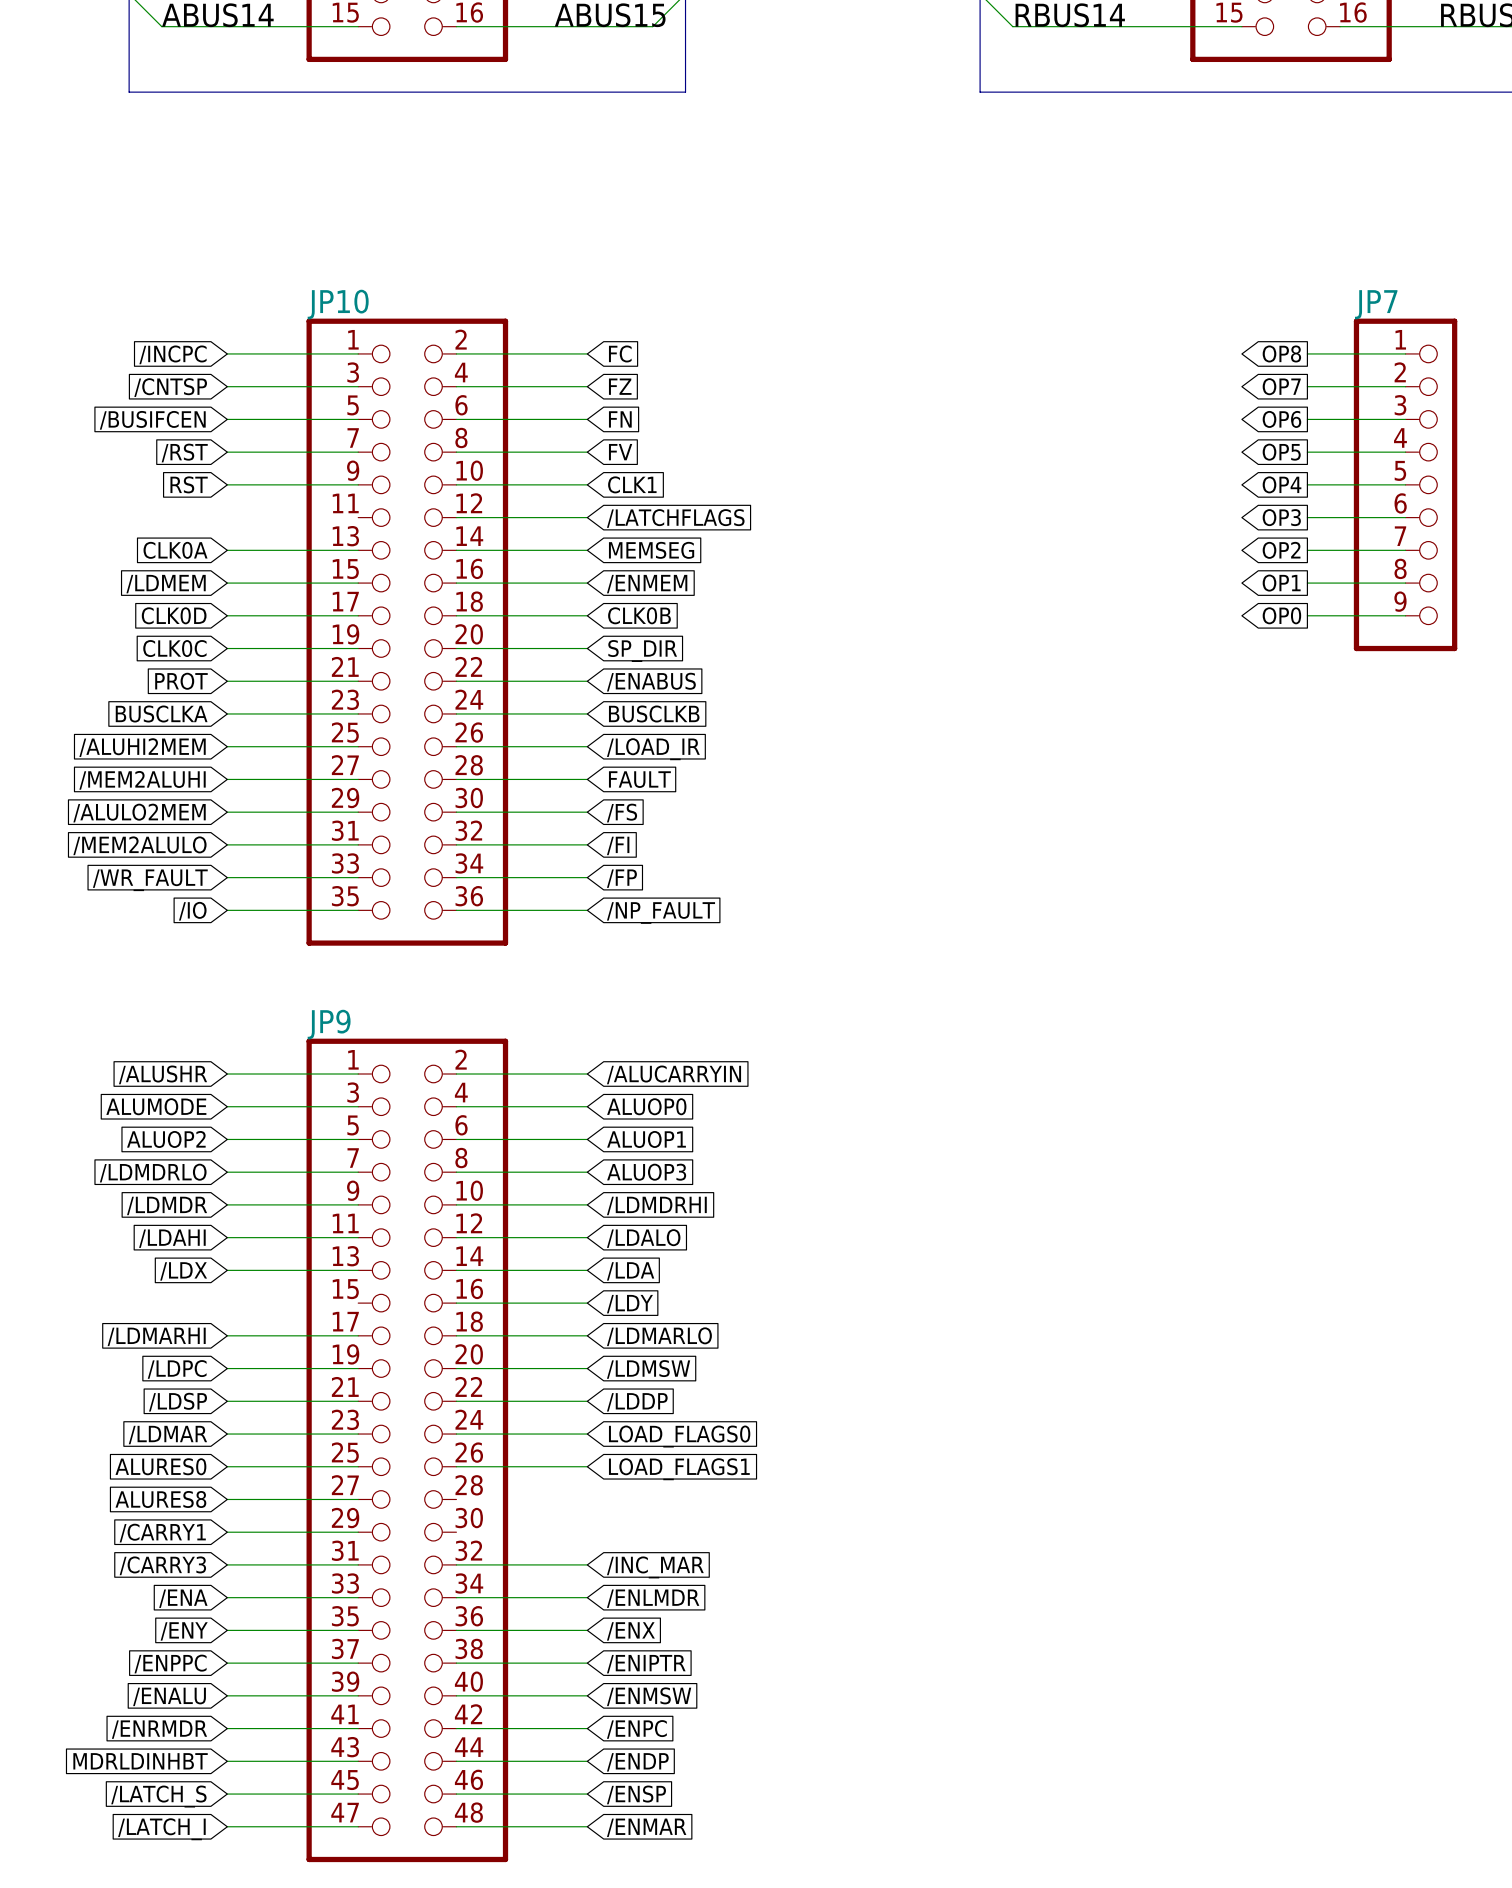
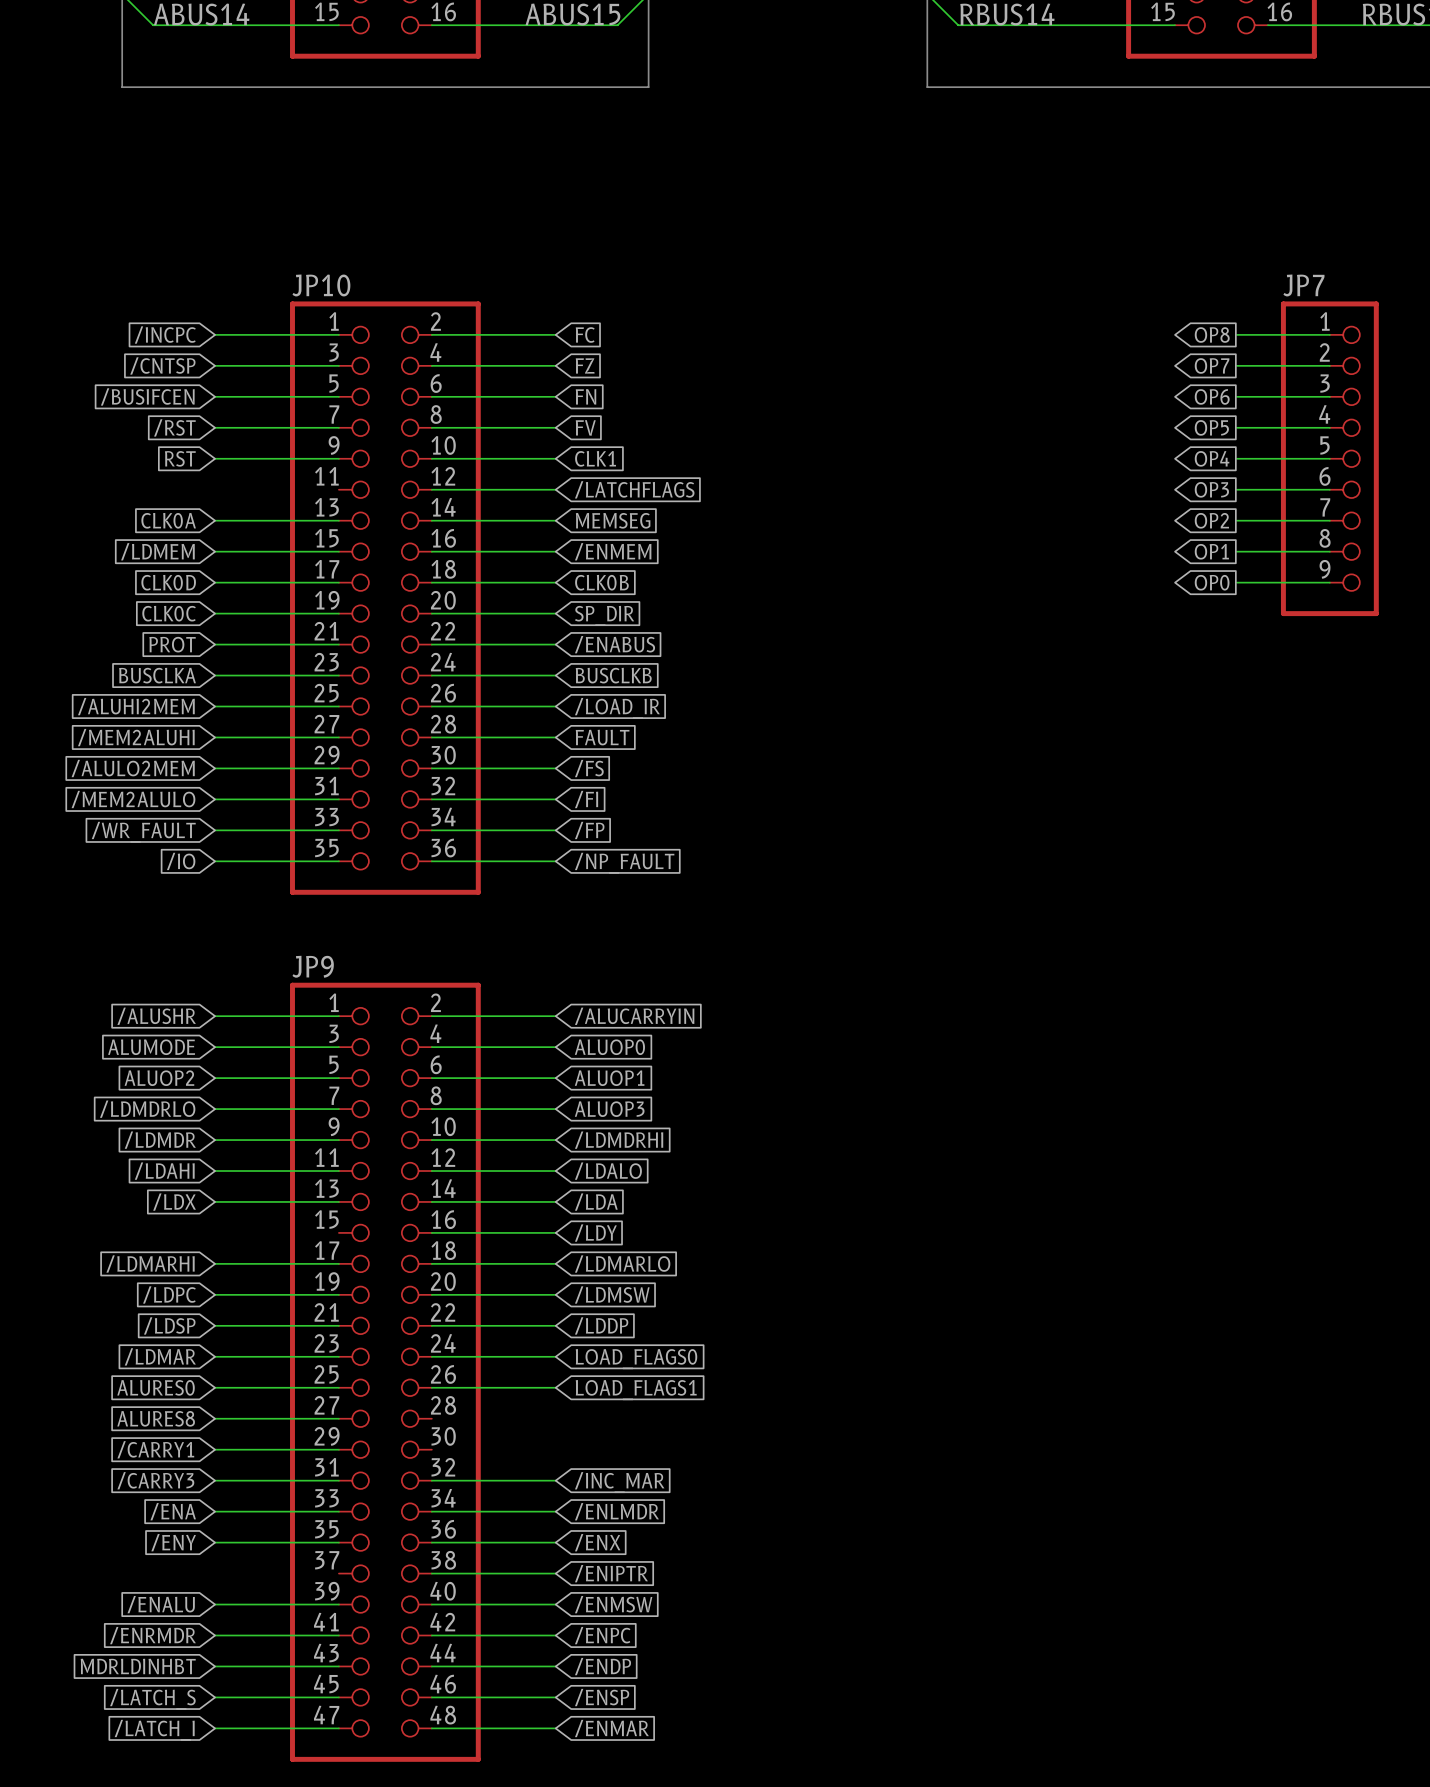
wire: (227, 1663) (358, 1663) -> none
global label: /ENPPC (170, 1664) -> none

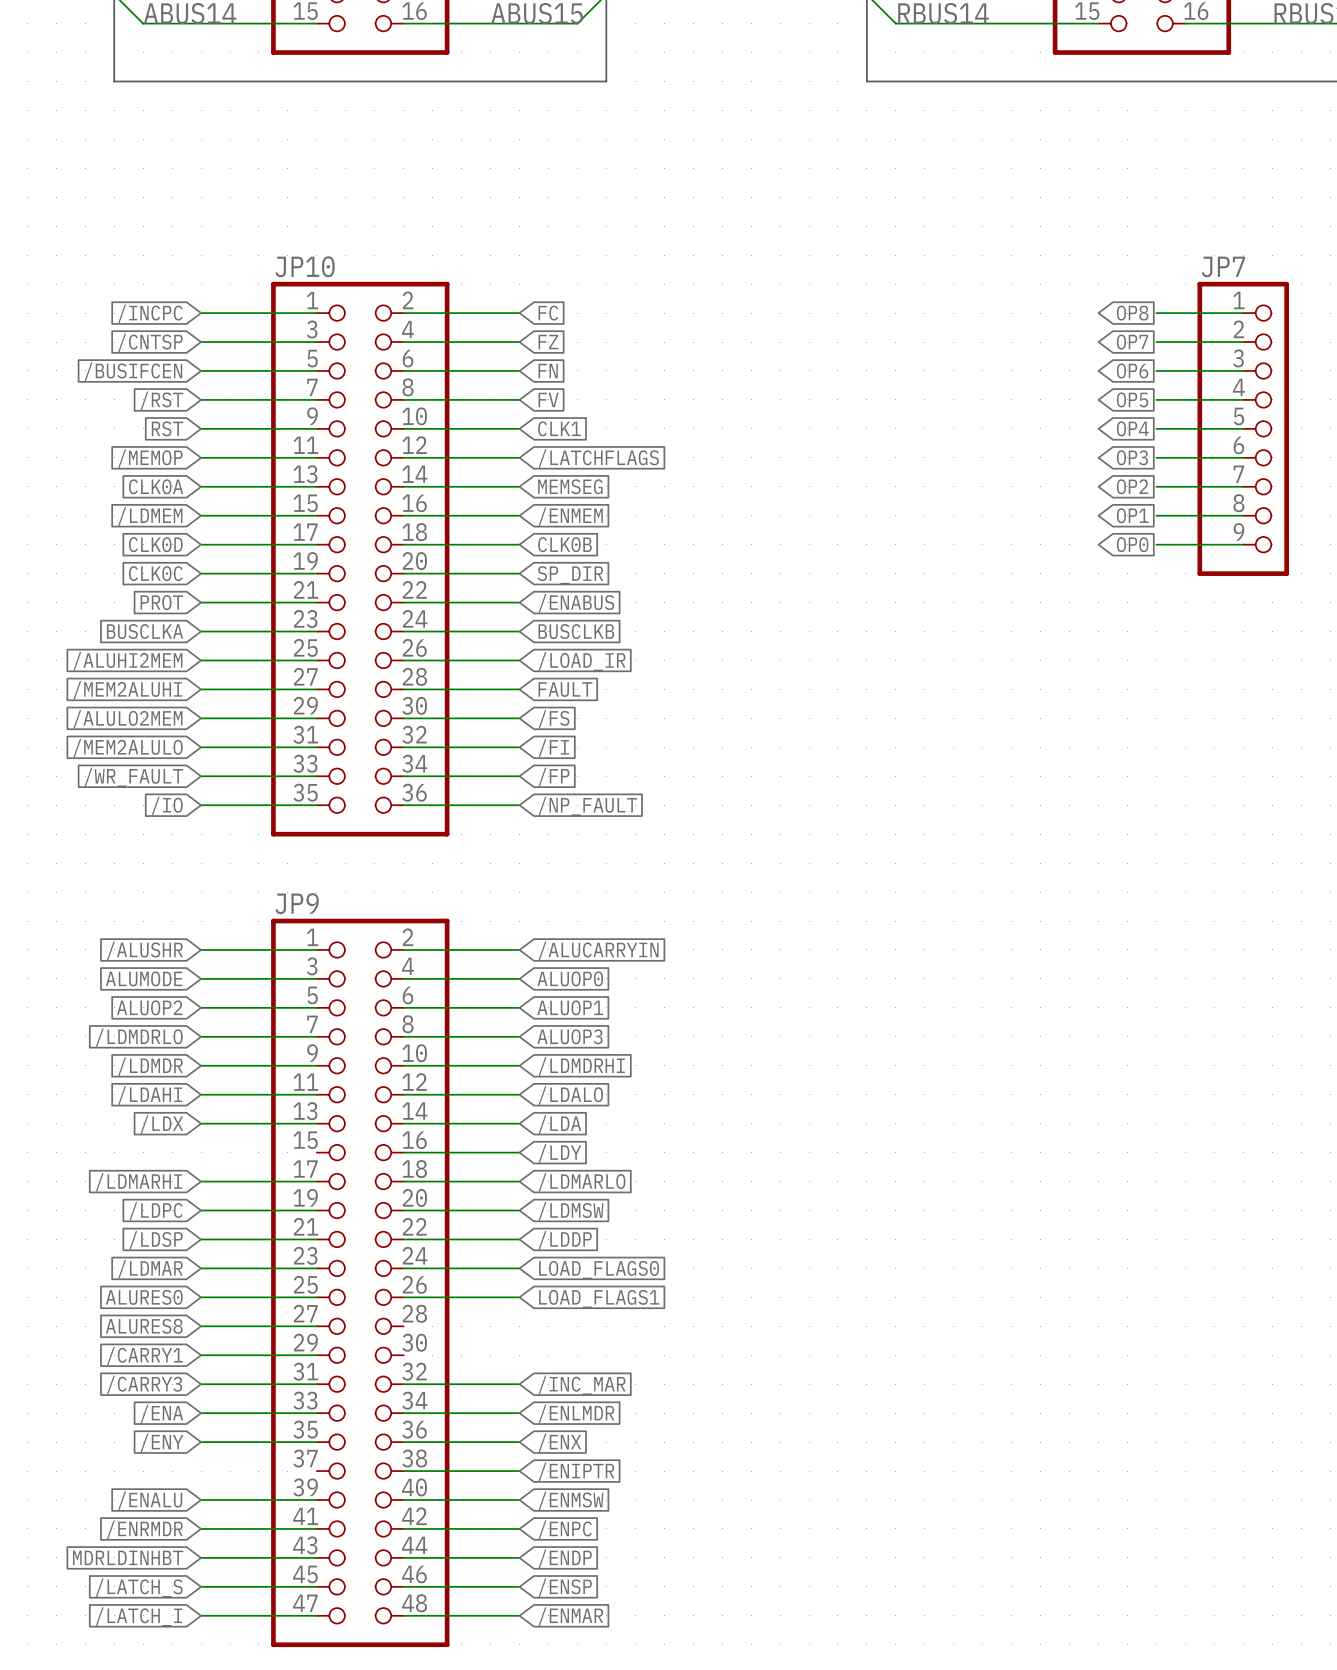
global label: none -> /MEMOP (150, 458)
wire: none -> (201, 457) (316, 457)

